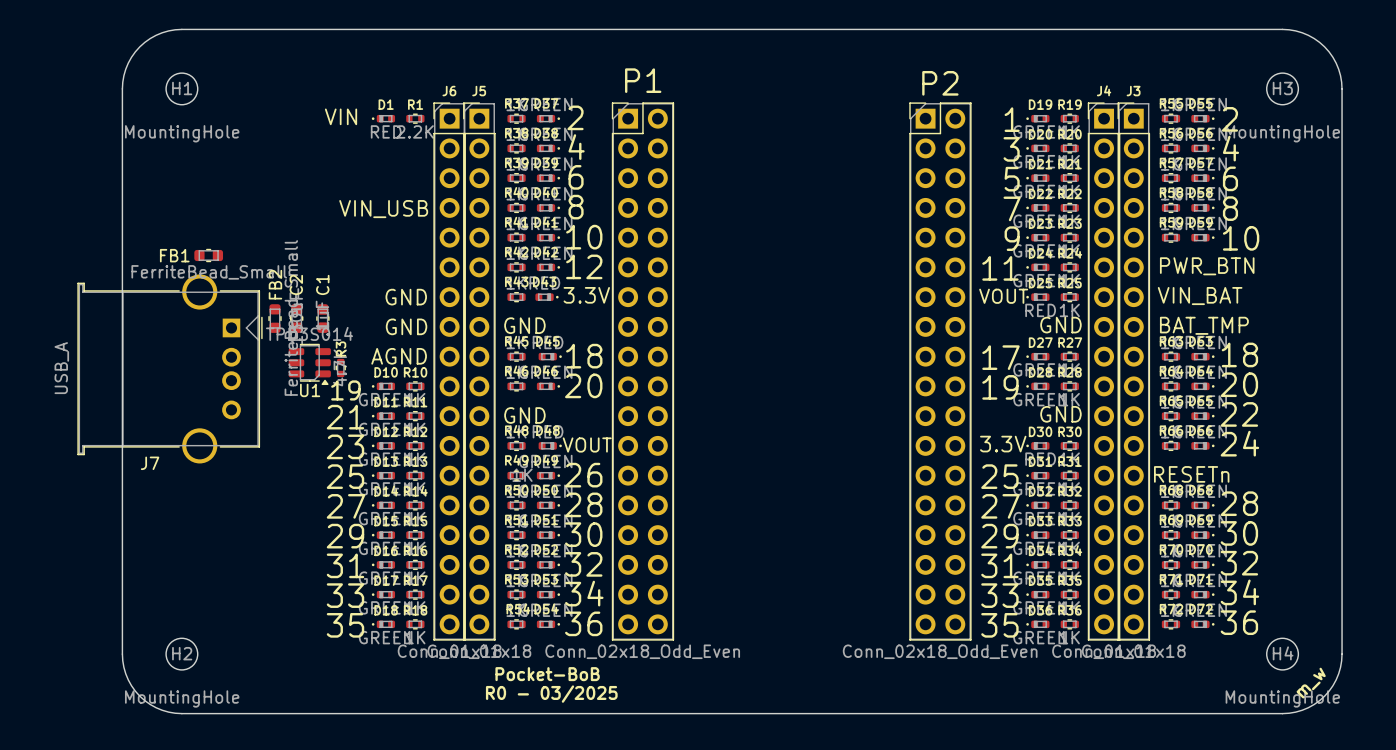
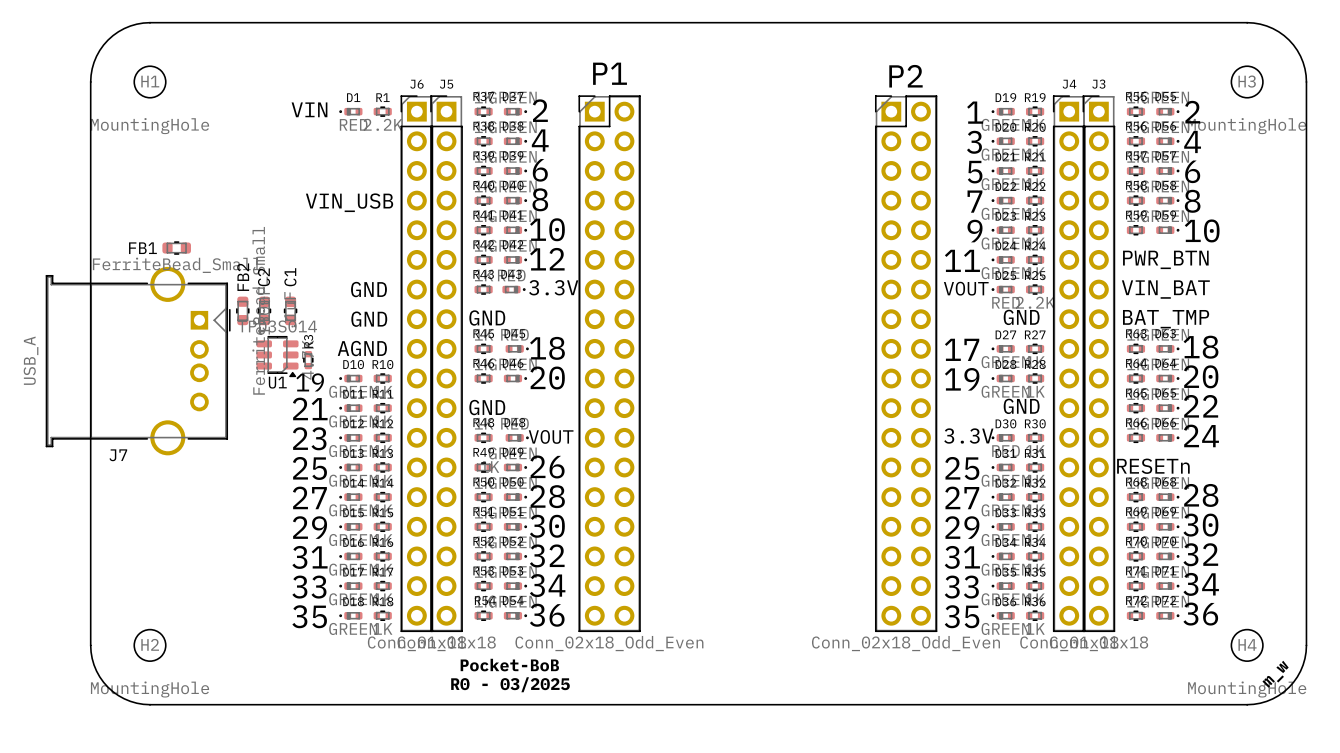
R25 value: 1K (1069, 310) -> 2.2K (1035, 302)

